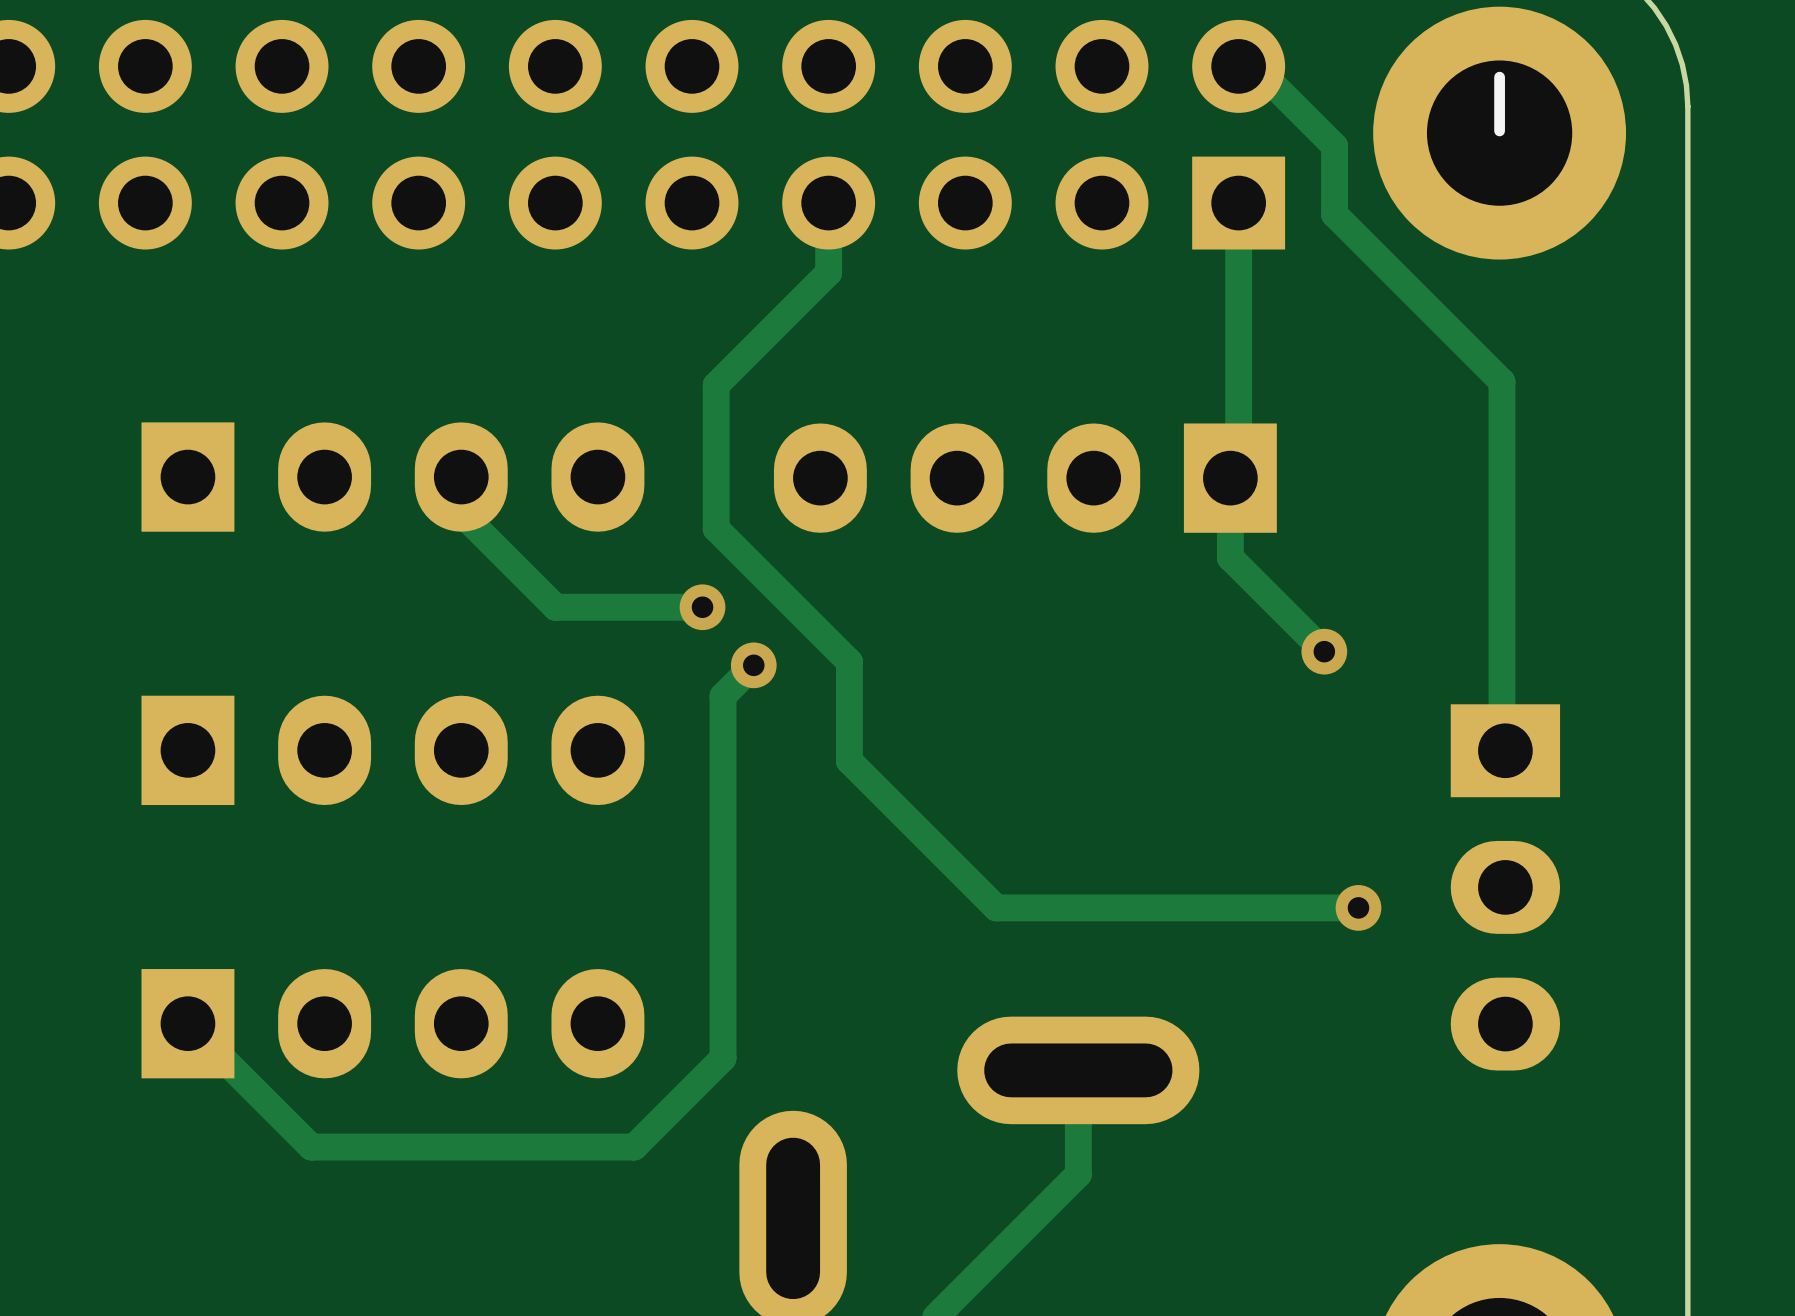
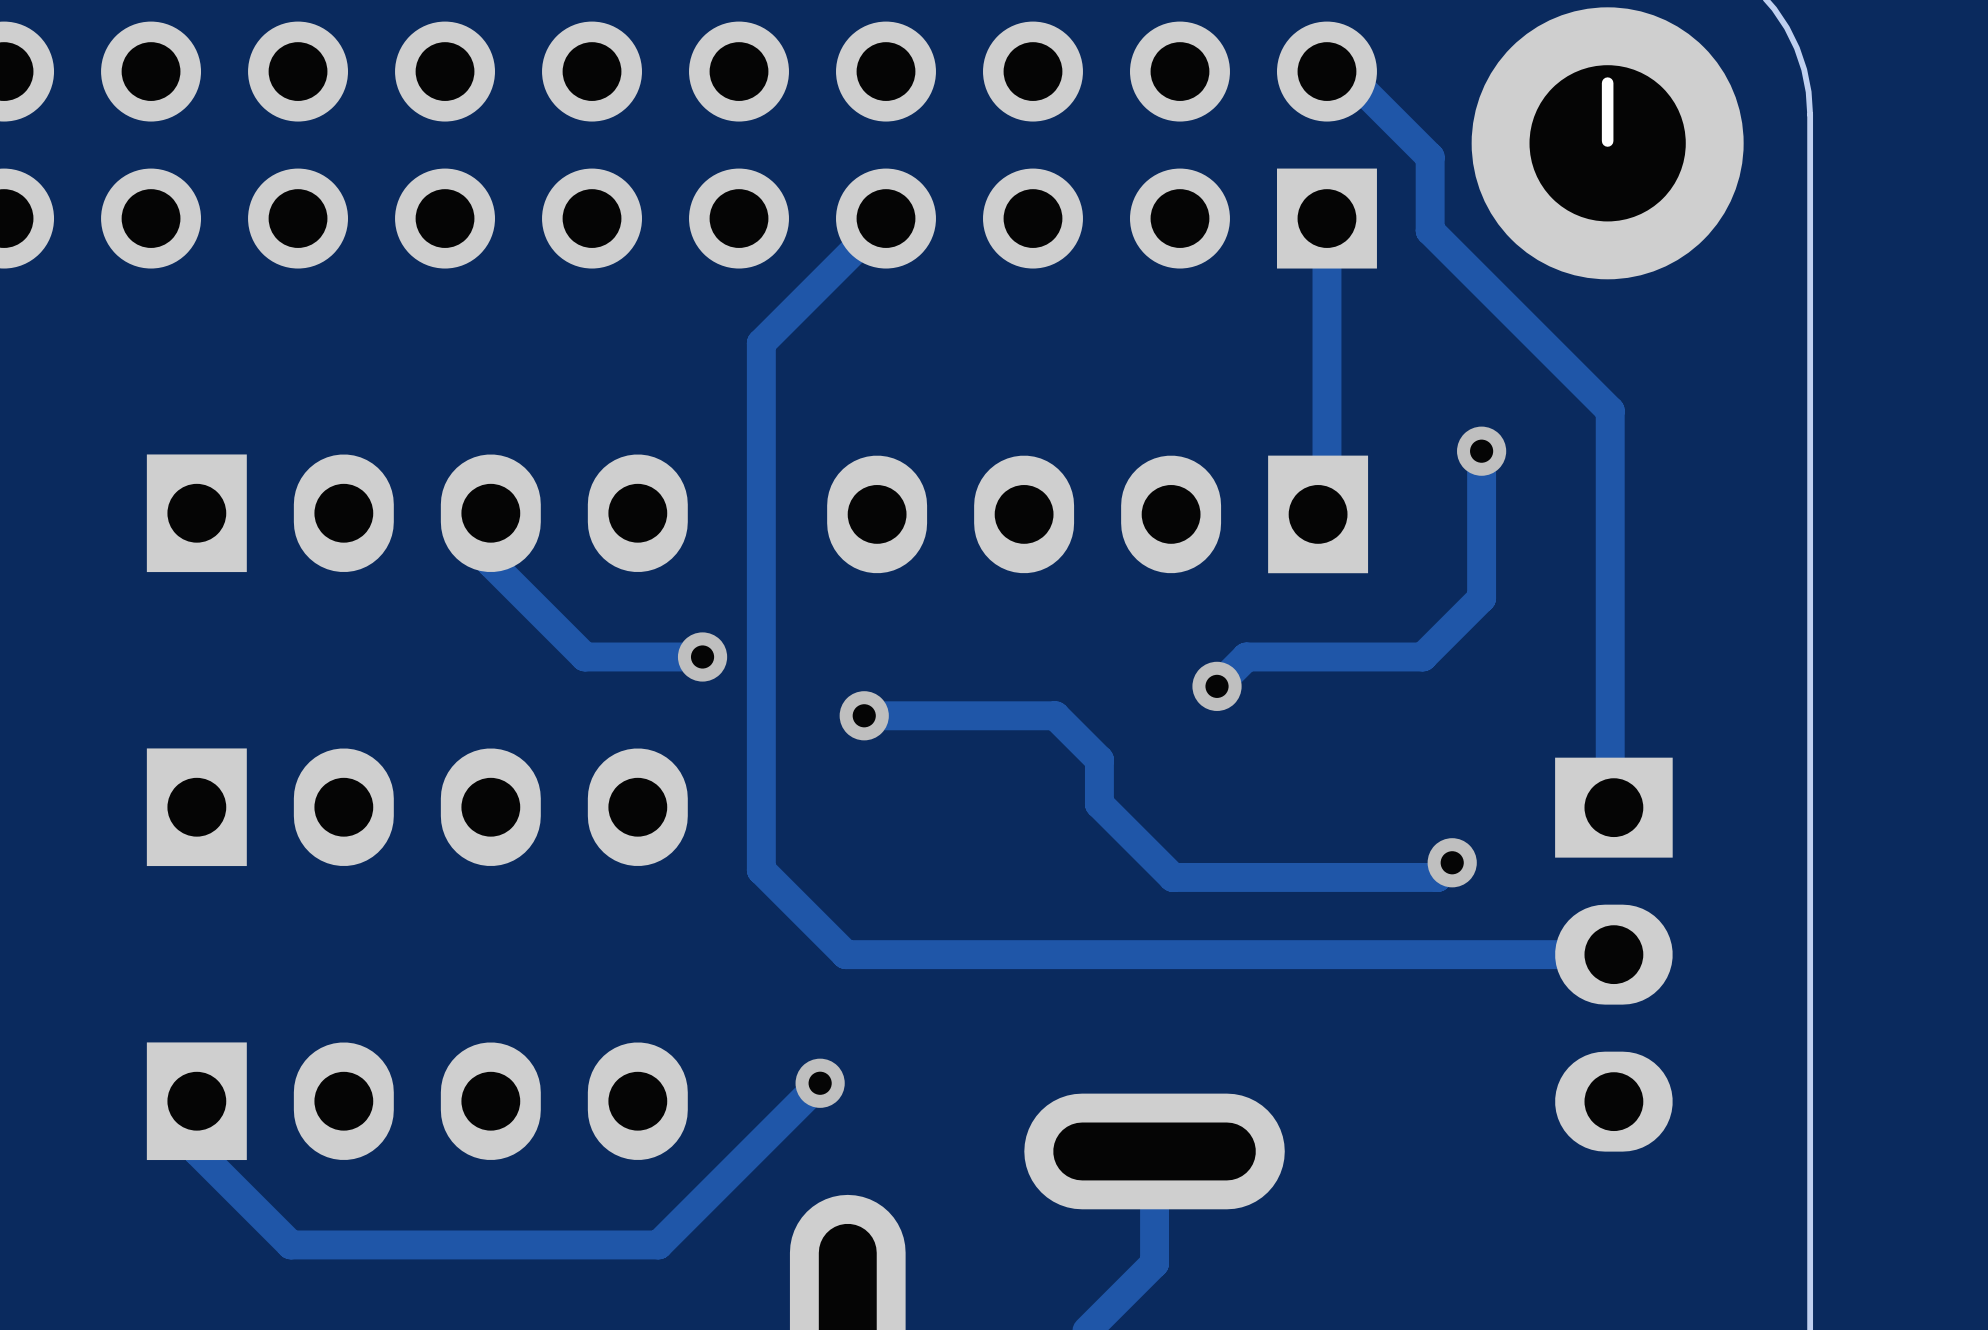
track: (828, 203) (828, 272) (716, 385) (716, 528) (849, 661) (849, 760) (996, 907) (1358, 907) -> (886, 218) (761, 343) (761, 870) (845, 954) (1573, 954)
track: none -> (1481, 451) (1481, 598) (1422, 656) (1246, 656) (1217, 686)
via: none -> (1481, 451)
track: (1230, 478) (1230, 557) (1324, 651) -> none
track: (461, 512) (555, 607) (702, 607) -> (490, 551) (490, 562) (584, 656) (702, 656)
via position: (702, 607) -> (702, 656)
via: none -> (1217, 686)
via: (1324, 651) -> none
track: (753, 665) (723, 696) (723, 1058) (634, 1147) (311, 1147) (187, 1023) -> (820, 1083) (658, 1244) (290, 1244) (196, 1150) (196, 1101)
via: (753, 665) -> none
track: none -> (864, 715) (1055, 715) (1099, 759) (1099, 803) (1172, 877) (1437, 877) (1452, 862)
via: none -> (864, 715)
via: none -> (1452, 862)
via: (1358, 907) -> none
via: none -> (820, 1083)

